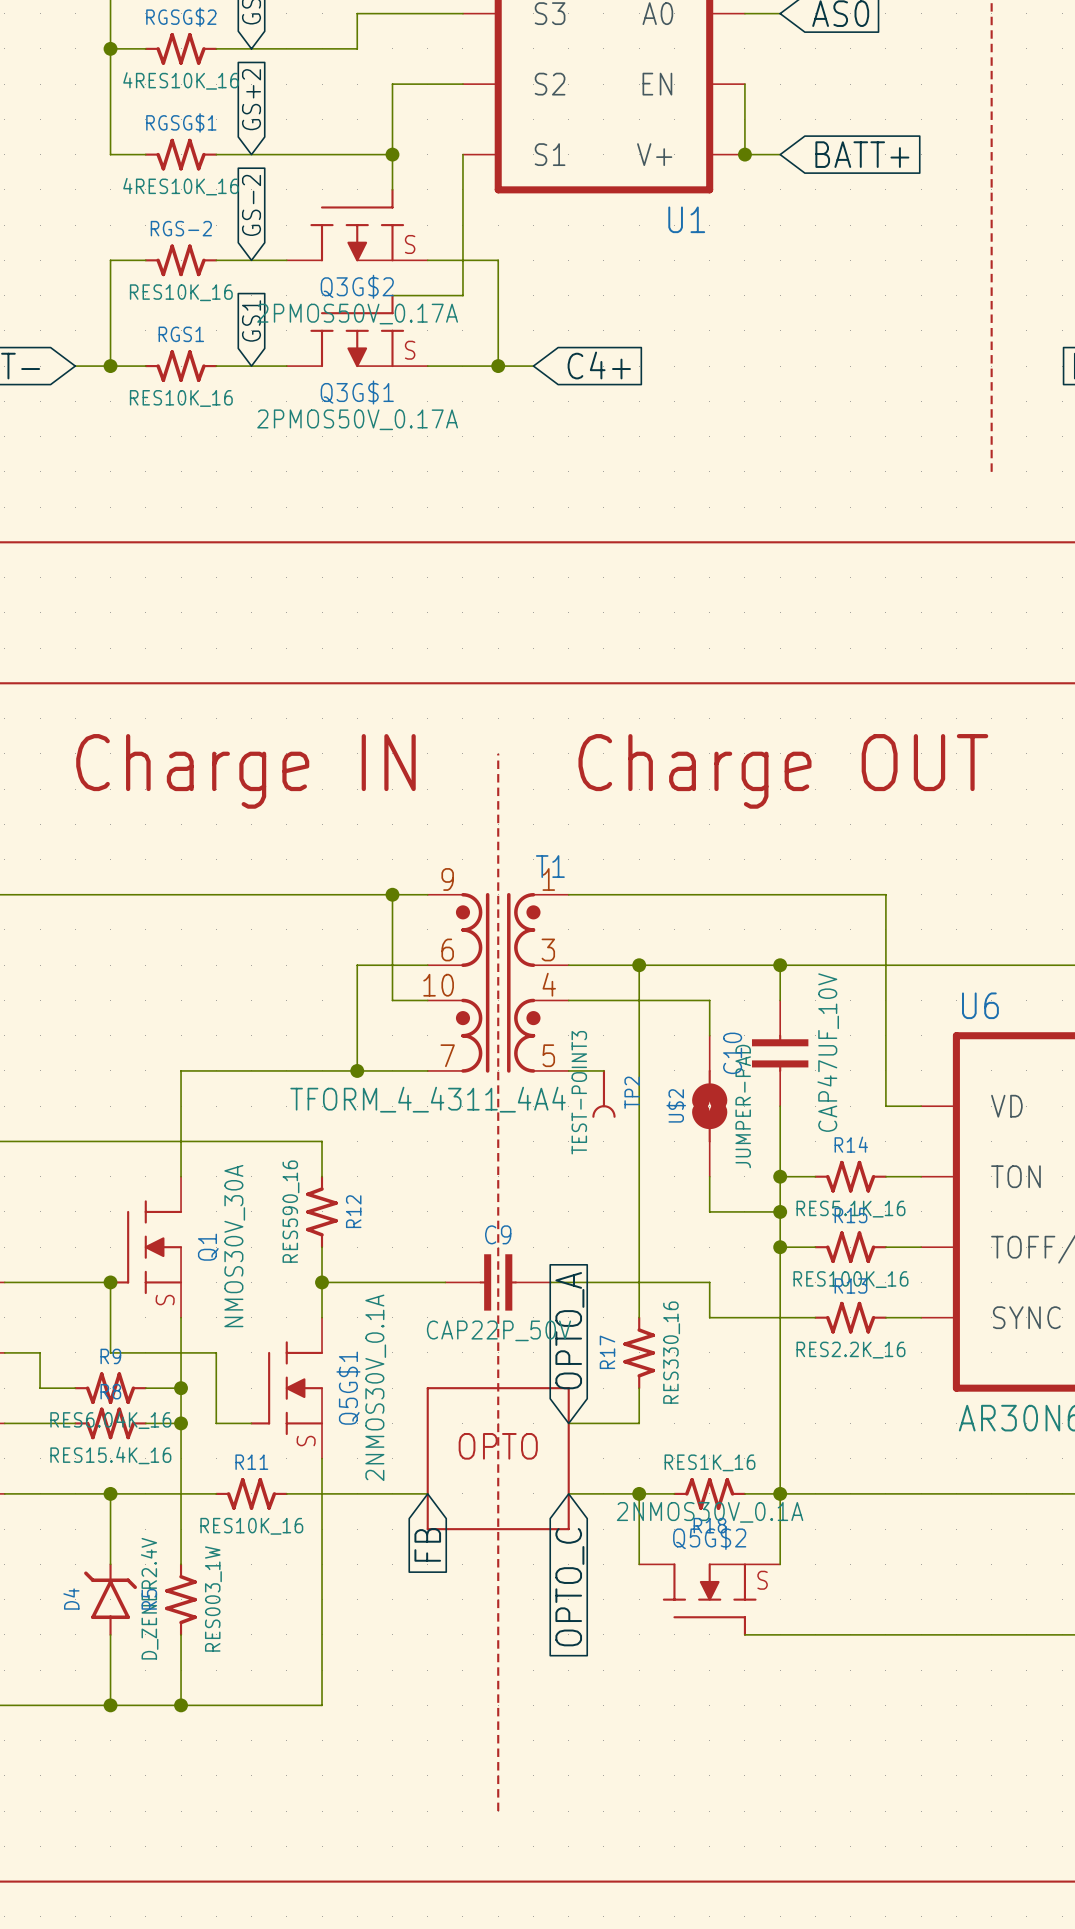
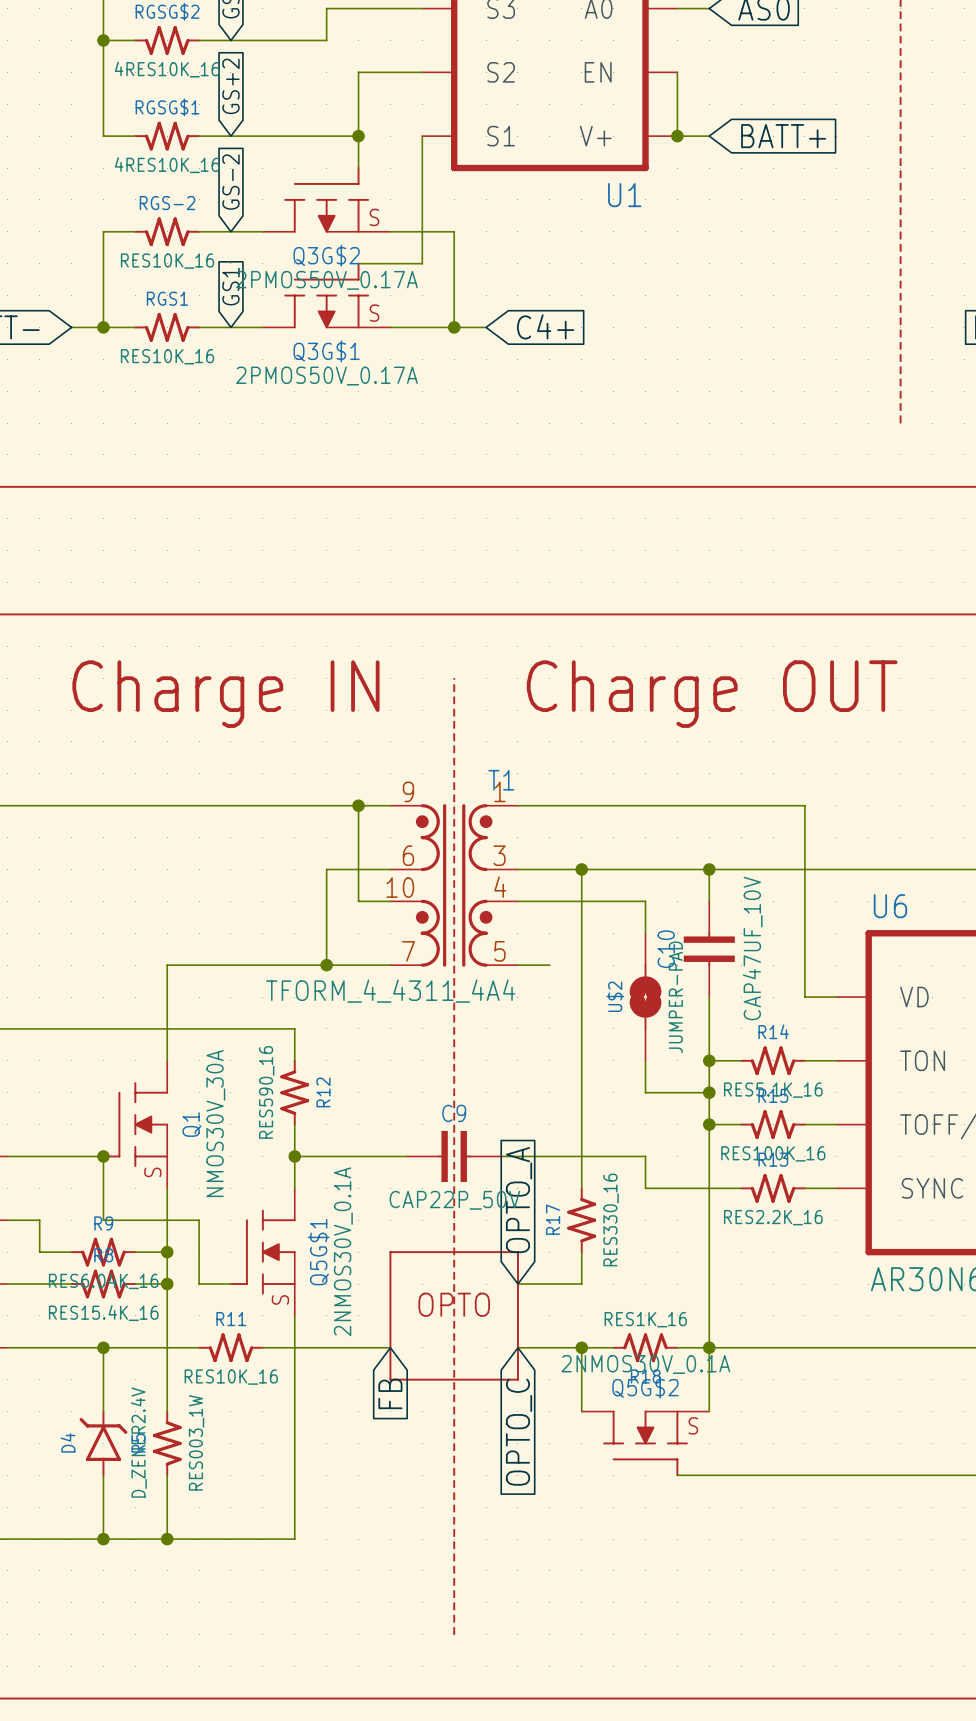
TP2: TEST-POINT3 (603, 1093) -> none

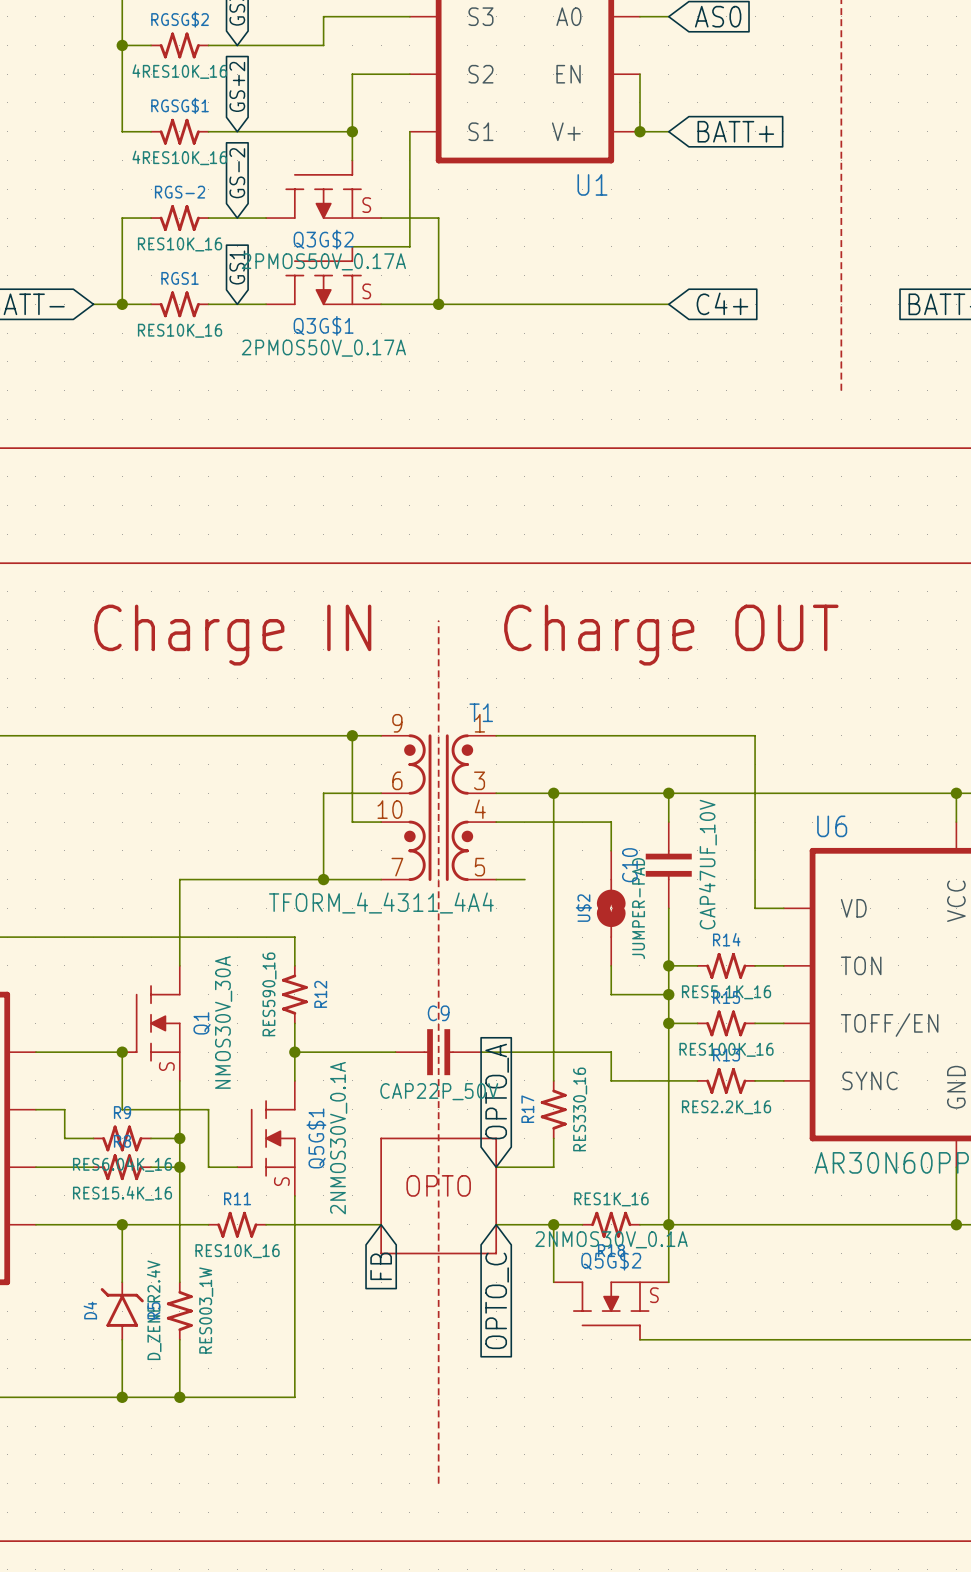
global label position: C4+ (545, 326) -> C4+ (722, 303)
wire: none -> (467, 304) (668, 304)

